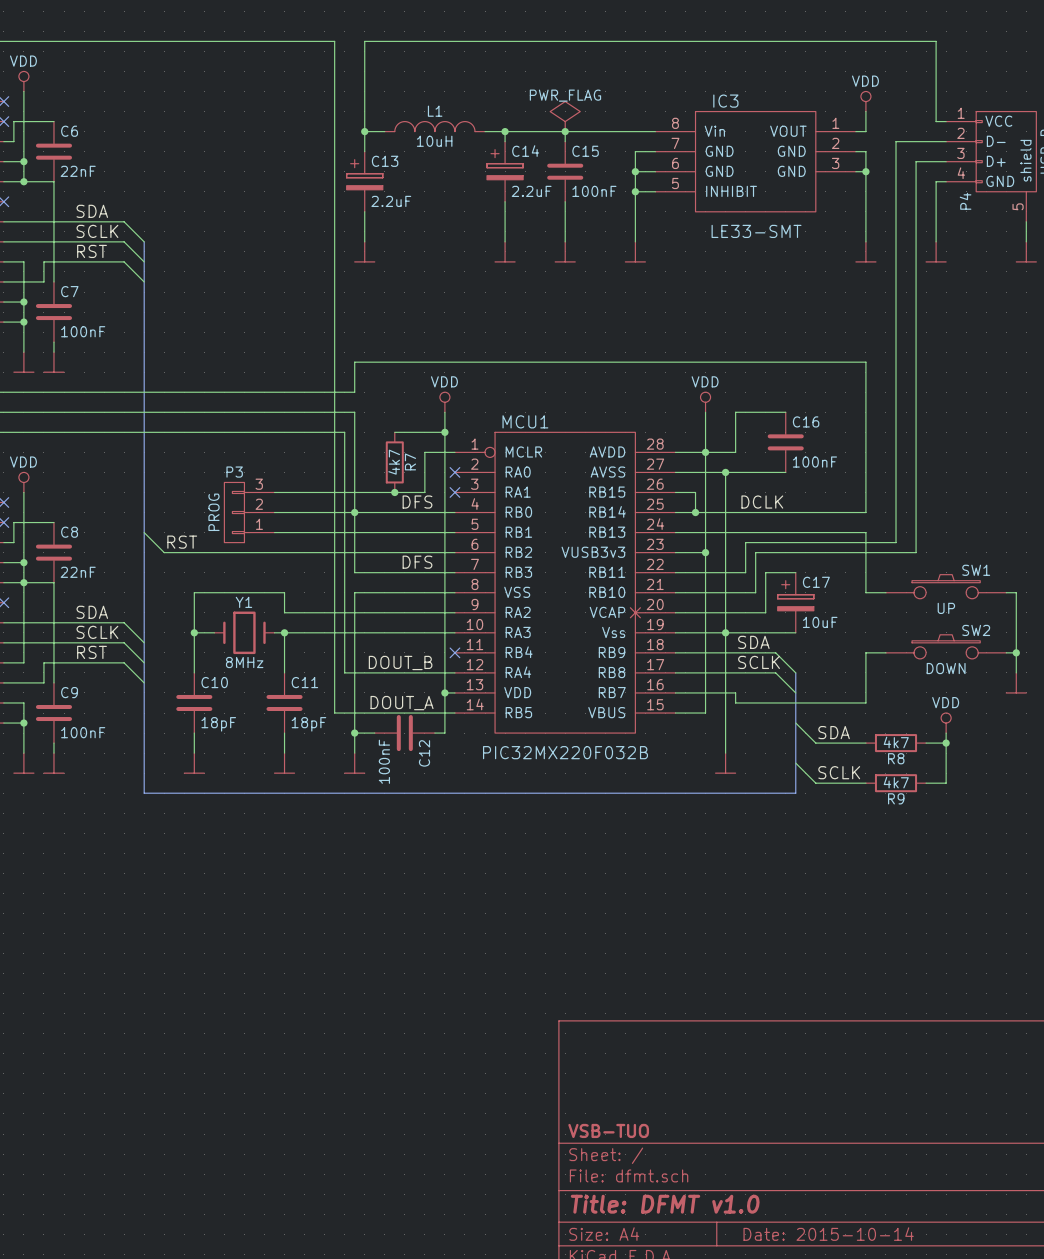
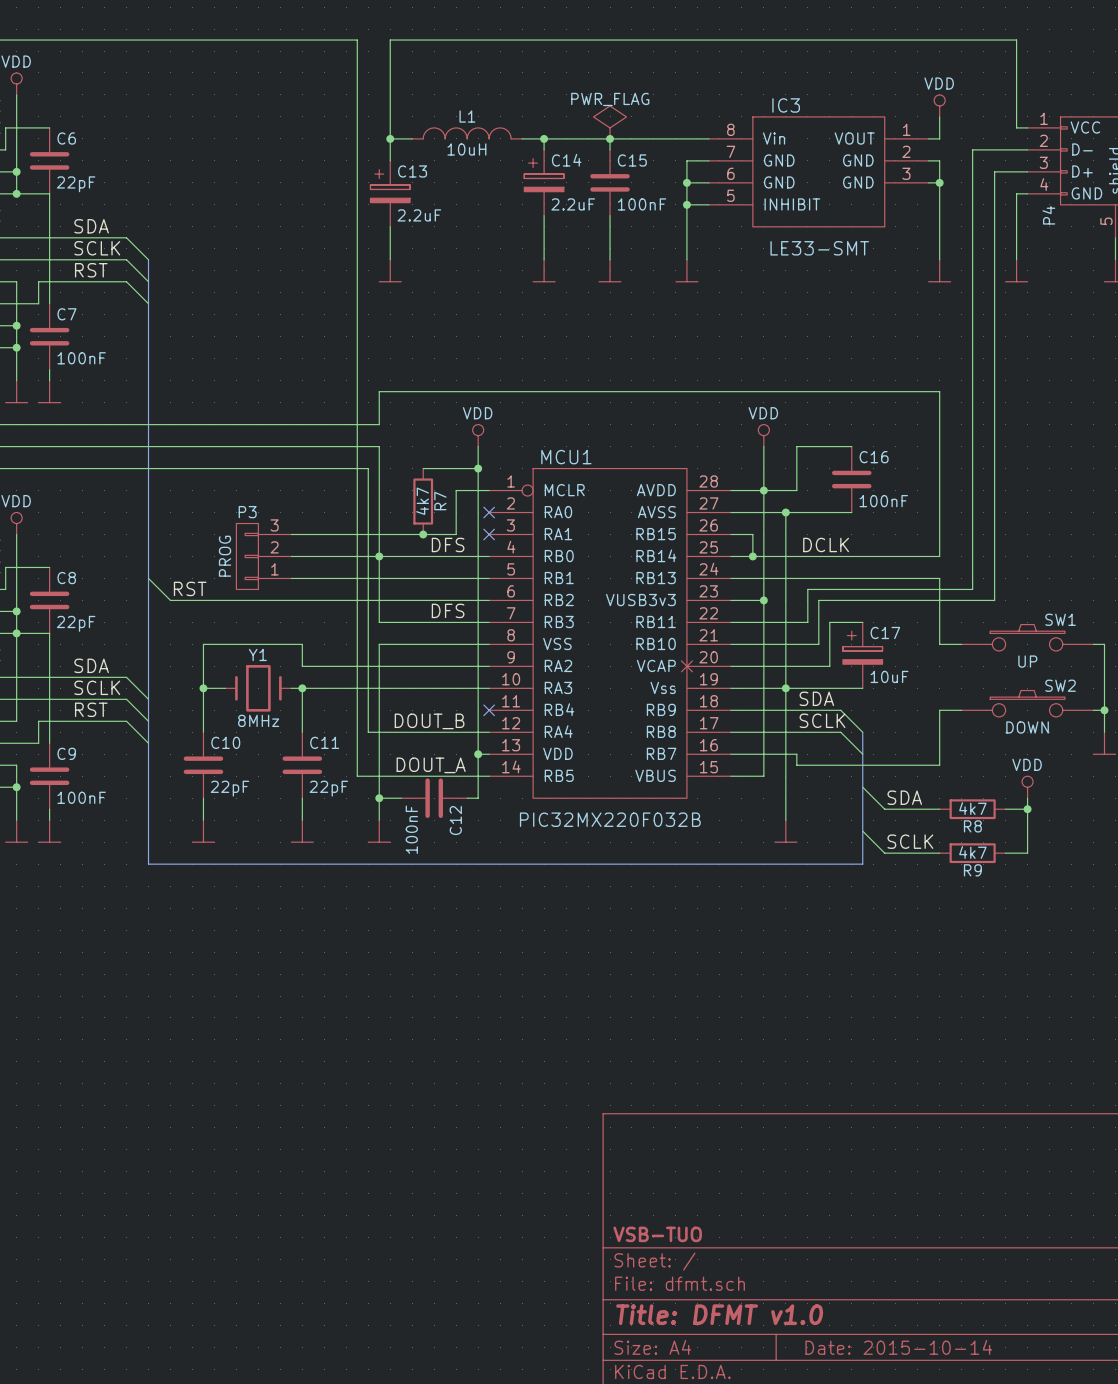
C6 value: 22nF (78, 171) -> 22pF (76, 184)
C8 value: 22nF (78, 572) -> 22pF (76, 623)
C10 value: 18pF (218, 724) -> 22pF (229, 788)
C11 value: 18pF (308, 724) -> 22pF (328, 788)

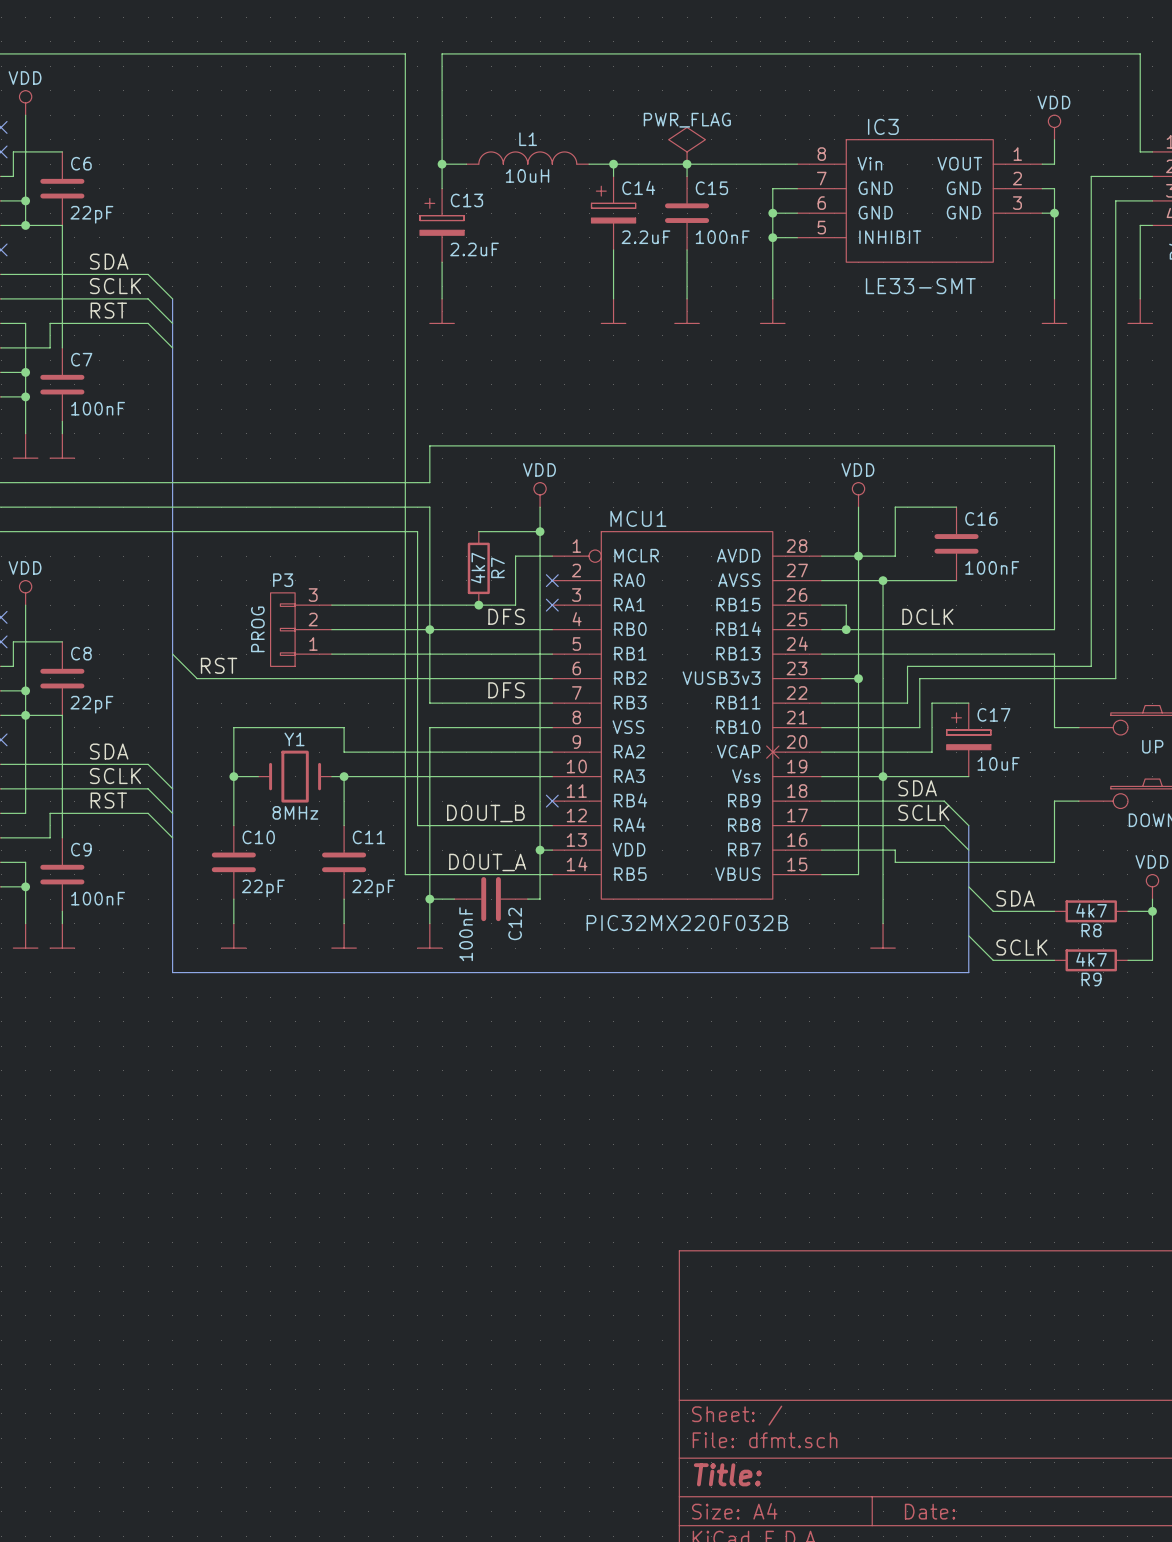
title block: VSB-TUO (657, 1234) -> none
title block: Title: DFMT v1.0 (719, 1314) -> Title: (727, 1474)
title block: Date: 2015-10-14 (898, 1347) -> Date: (930, 1511)

